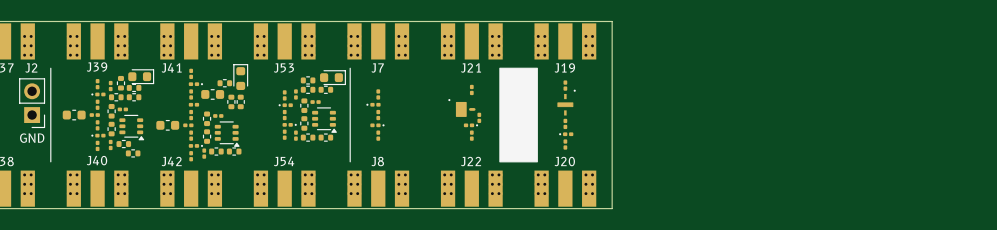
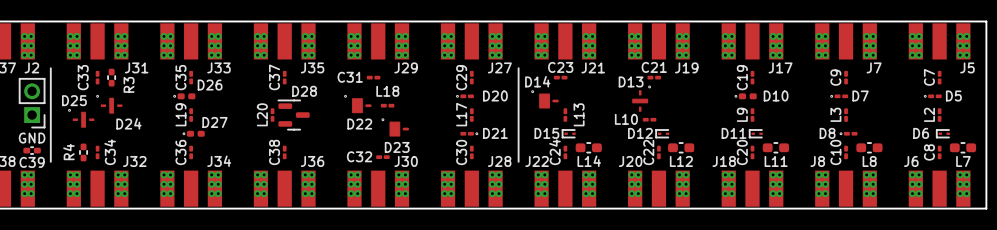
board edge: (612, 21) (612, 208) -> (612, 21) (986, 21) (986, 208) (612, 208)
J19: none -> (658, 41)
J17: none -> (752, 41)
J7: none -> (846, 41)
J5: none -> (939, 41)
J39 name: J39 (97, 67) -> J31 (136, 67)
J41 name: J41 (171, 67) -> J33 (218, 67)
J53 name: J53 (283, 67) -> J35 (312, 67)
J7 name: J7 (377, 67) -> J29 (406, 67)
J21 name: J21 (471, 67) -> J27 (499, 67)
drawing: [499, 67, 538, 163] -> none
J19 name: J19 (564, 67) -> J21 (593, 67)
line: (350, 68) (350, 161) -> (518, 68) (518, 161)
part: (191, 73) -> none
part: (141, 76) -> none
C33: none -> (97, 77)
R3: none -> (111, 77)
C35: none -> (191, 77)
part: (240, 77) -> none
C37: none -> (284, 77)
part: (332, 77) -> none
C31: none -> (373, 77)
C29: none -> (471, 77)
C23: none -> (560, 77)
C21: none -> (654, 77)
C19: none -> (752, 77)
C9: none -> (846, 77)
C7: none -> (939, 77)
part: (308, 80) -> none
part: (120, 83) -> none
part: (224, 83) -> none
part: (97, 84) -> none
part: (195, 84) -> none
part: (565, 85) -> none
part: (110, 86) -> none
part: (134, 87) -> none
part: (308, 89) -> none
part: (325, 89) -> none
part: (471, 89) -> none
part: (98, 94) -> none
part: (191, 94) -> none
part: (212, 94) -> none
part: (295, 94) -> none
part: (378, 94) -> none
part: (284, 95) -> none
D26: none -> (184, 96)
D20: none -> (465, 96)
D10: none -> (745, 96)
D7: none -> (839, 96)
D5: none -> (933, 96)
part: (116, 97) -> none
part: (134, 97) -> none
D13: none -> (641, 98)
D14: none -> (545, 99)
part: (231, 101) -> none
part: (240, 101) -> none
part: (315, 102) -> none
part: (566, 102) -> none
part: (97, 104) -> none
D24: none -> (109, 104)
part: (193, 104) -> none
D22: none -> (358, 104)
part: (373, 104) -> none
part: (285, 105) -> none
part: (304, 105) -> none
L18: none -> (387, 105)
part: (461, 107) -> none
part: (122, 109) -> none
part: (111, 111) -> none
part: (74, 115) -> none
part: (94, 115) -> none
part: (191, 115) -> none
L19: none -> (191, 115)
part: (218, 115) -> none
L20: none -> (272, 115)
part: (284, 115) -> none
D28: none -> (293, 115)
part: (378, 115) -> none
L17: none -> (471, 115)
L13: none -> (565, 115)
L9: none -> (752, 115)
L3: none -> (846, 115)
L2: none -> (939, 115)
part: (479, 117) -> none
D25: none -> (81, 118)
part: (207, 118) -> none
L10: none -> (649, 119)
part: (324, 120) -> none
part: (304, 123) -> none
part: (565, 123) -> none
part: (289, 124) -> none
part: (97, 125) -> none
part: (167, 125) -> none
part: (188, 125) -> none
part: (377, 125) -> none
part: (470, 125) -> none
part: (131, 127) -> none
D23: none -> (395, 127)
part: (111, 129) -> none
D27: none -> (193, 133)
D21: none -> (469, 133)
D15: none -> (568, 133)
D12: none -> (662, 133)
D11: none -> (755, 133)
D8: none -> (848, 133)
D6: none -> (943, 133)
part: (227, 134) -> none
part: (284, 134) -> none
part: (566, 134) -> none
part: (98, 135) -> none
part: (191, 135) -> none
part: (295, 135) -> none
part: (378, 135) -> none
part: (471, 135) -> none
part: (207, 136) -> none
part: (308, 137) -> none
part: (325, 137) -> none
part: (110, 144) -> none
part: (123, 144) -> none
part: (565, 144) -> none
part: (97, 145) -> none
part: (195, 145) -> none
L14: none -> (588, 147)
L12: none -> (681, 147)
L11: none -> (775, 147)
L8: none -> (869, 147)
L7: none -> (963, 147)
C39: none -> (32, 150)
part: (216, 151) -> none
part: (234, 151) -> none
R4: none -> (83, 152)
C34: none -> (97, 152)
C36: none -> (191, 152)
C38: none -> (284, 152)
C30: none -> (471, 152)
C24: none -> (565, 152)
C22: none -> (658, 152)
C20: none -> (752, 152)
C10: none -> (846, 152)
C8: none -> (939, 152)
part: (133, 153) -> none
part: (204, 153) -> none
part: (191, 156) -> none
C32: none -> (382, 157)
J40 name: J40 (97, 160) -> J32 (134, 161)
J42 name: J42 (171, 161) -> J34 (219, 161)
J54 name: J54 (284, 161) -> J36 (312, 161)
J8 name: J8 (377, 161) -> J30 (406, 161)
J22 name: J22 (471, 161) -> J28 (499, 161)
J20 name: J20 (564, 161) -> J22 (537, 161)
J20: none -> (658, 188)
J18: none -> (752, 188)
J8: none -> (846, 188)
J6: none -> (939, 188)

